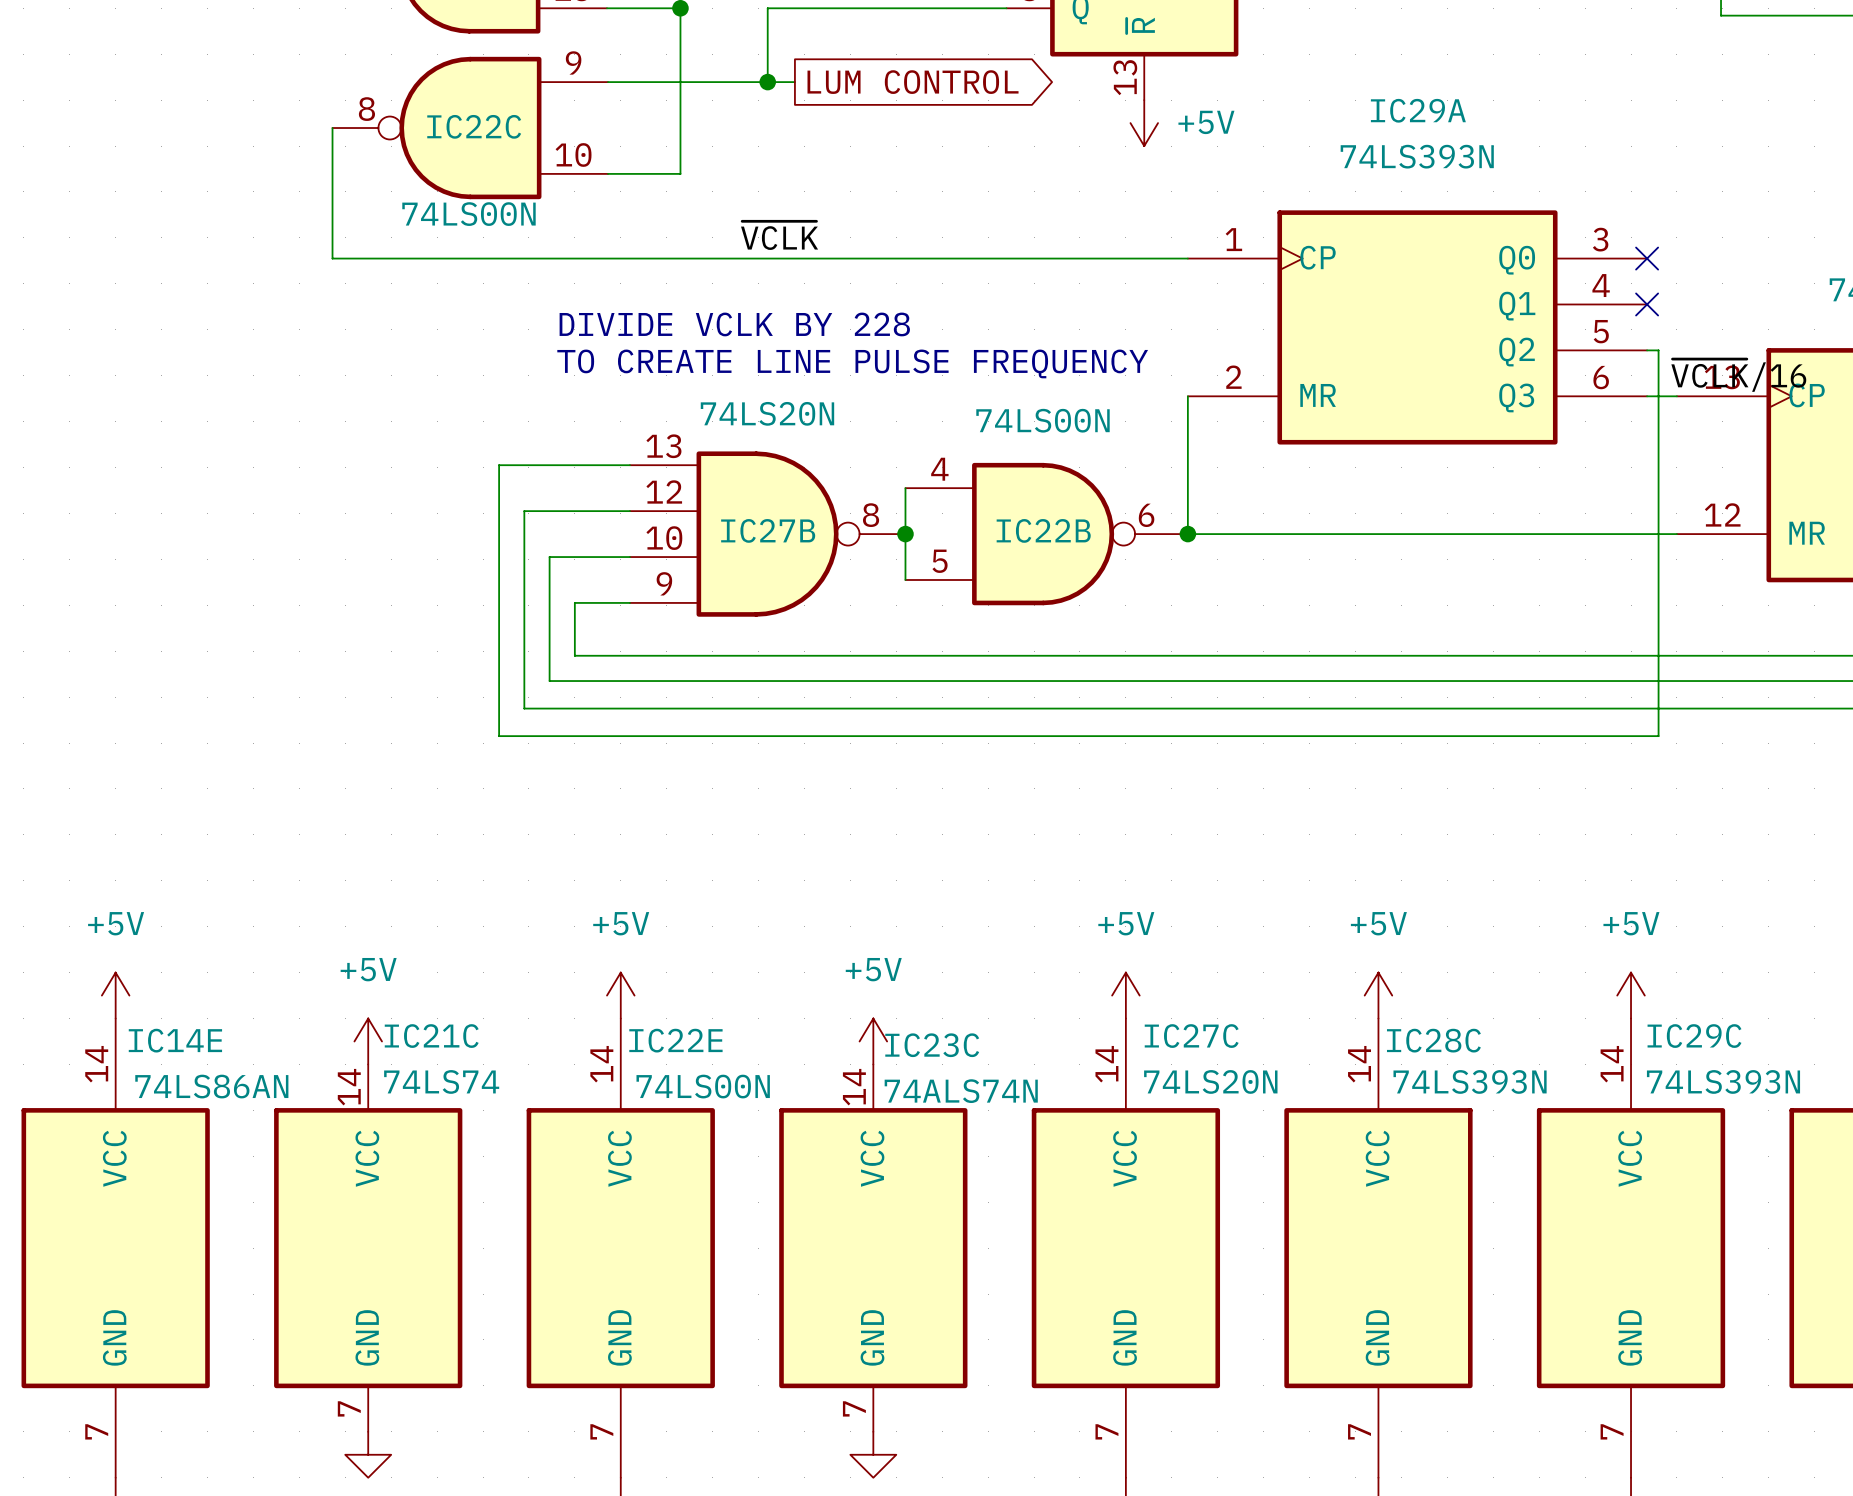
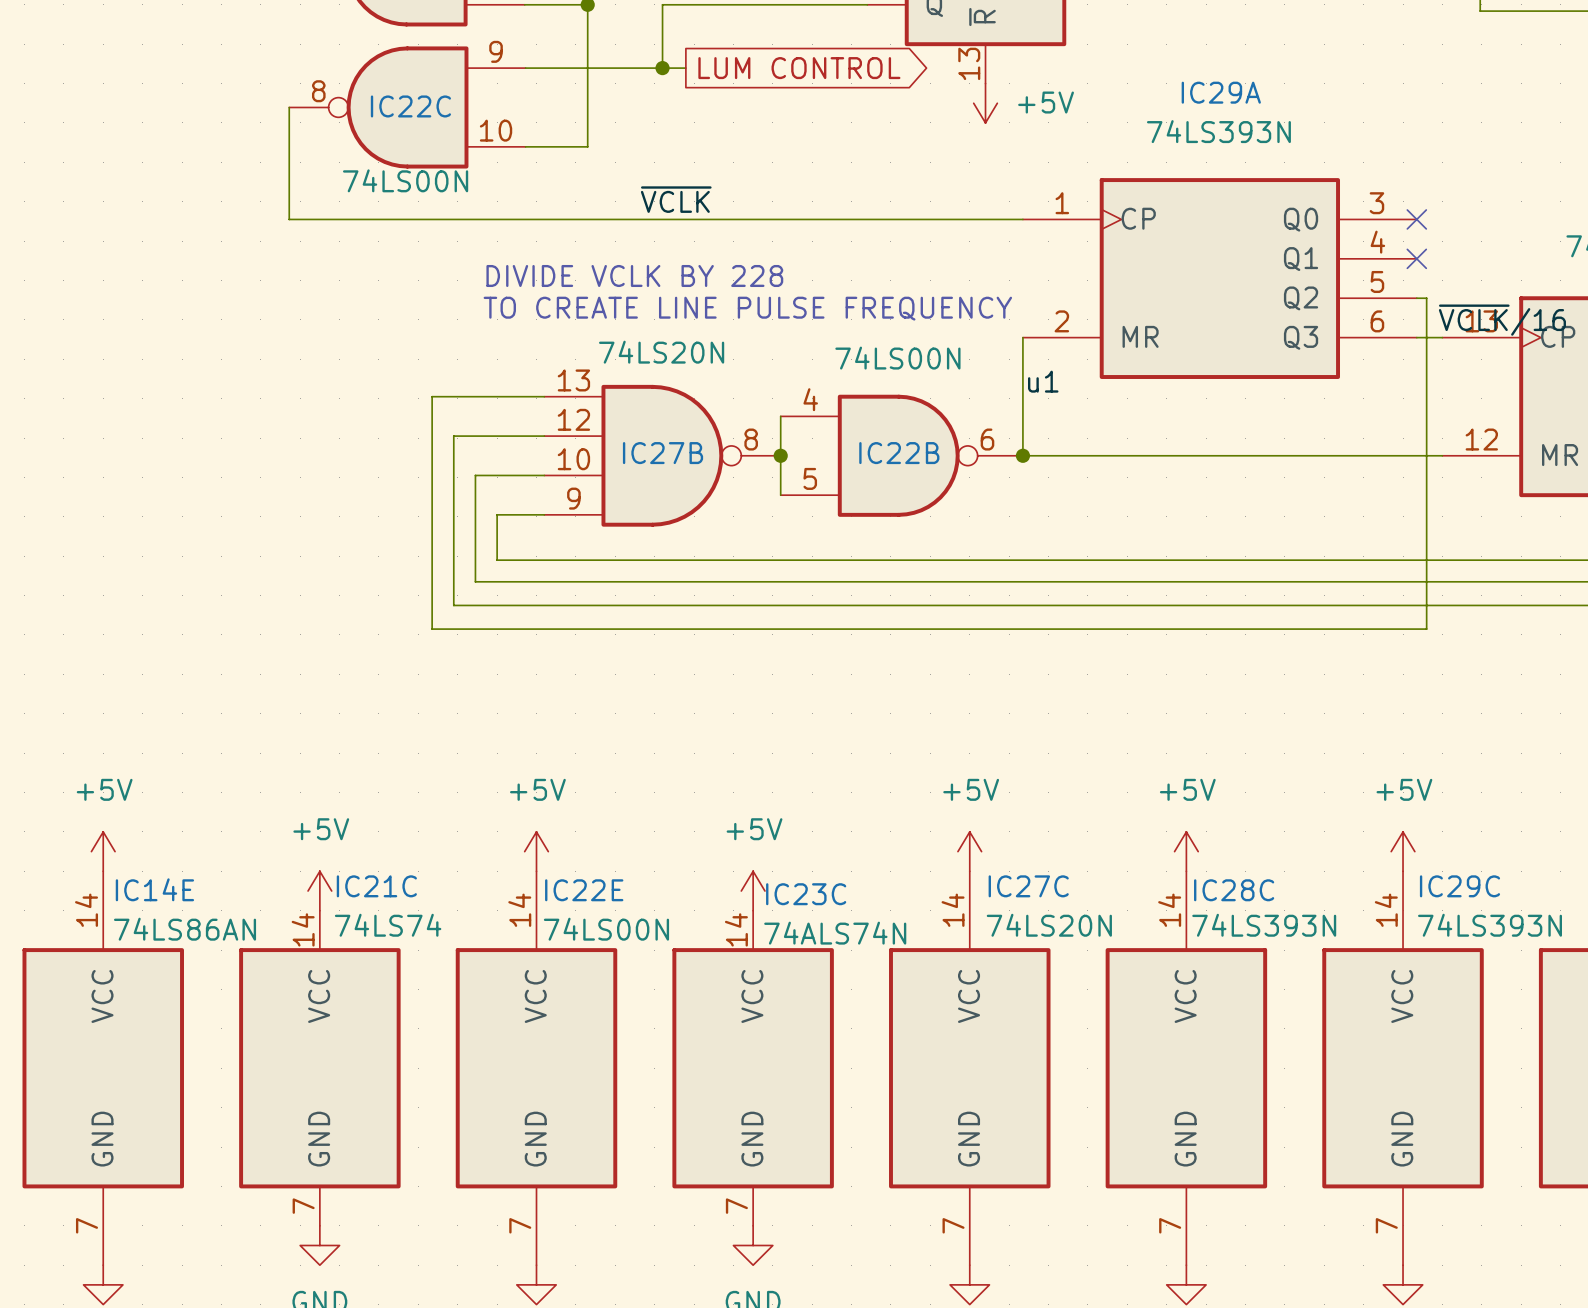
label: none -> u1 (1043, 381)

